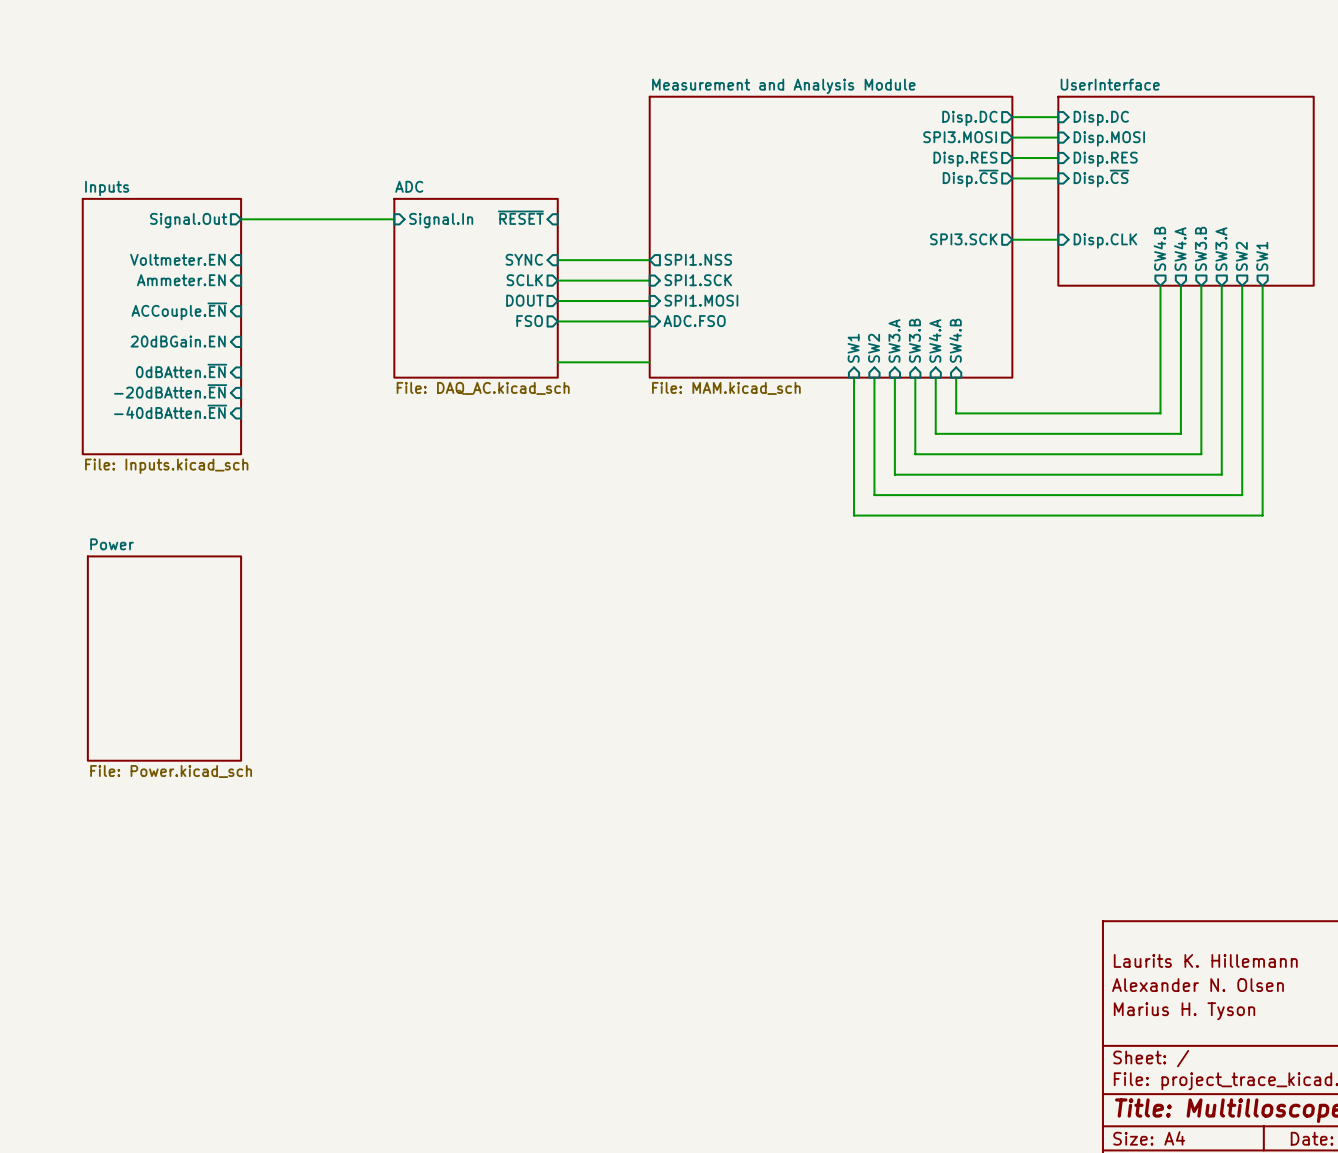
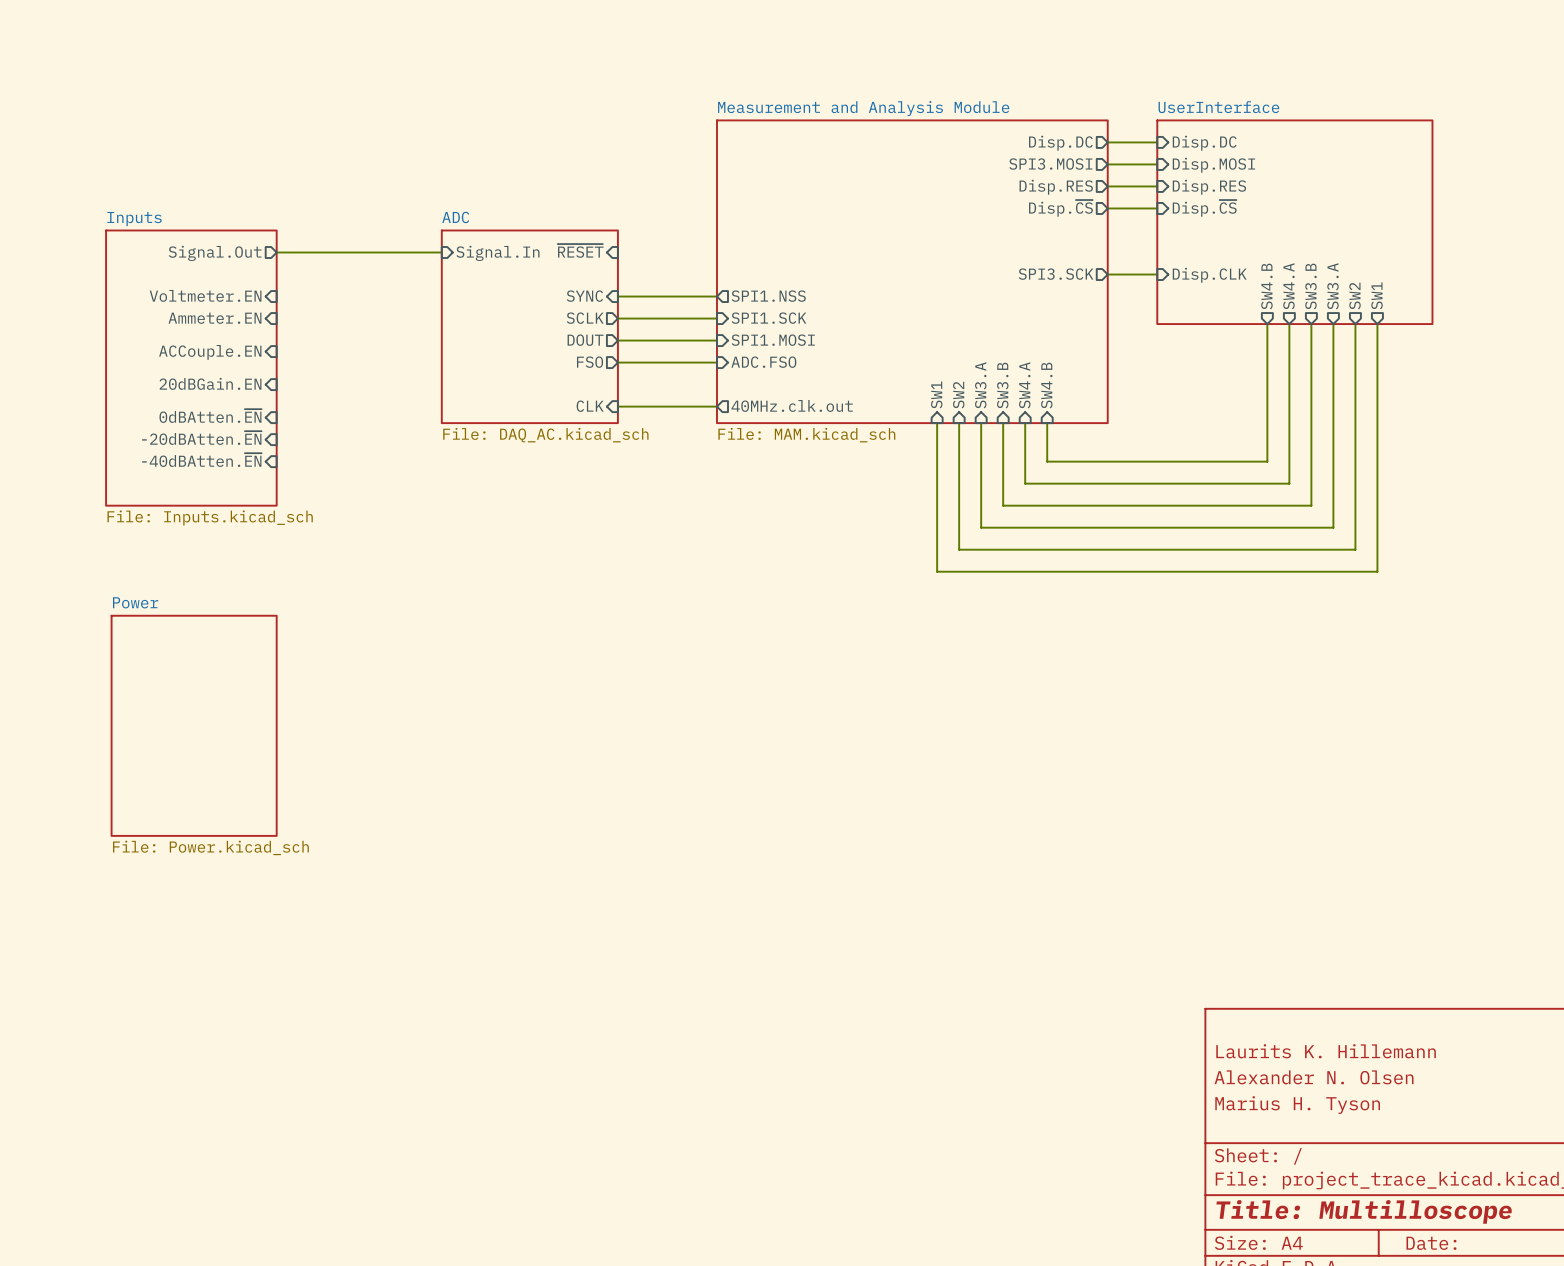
sheet pin: ACCouple.~{EN} (179, 311) -> ACCouple.EN (210, 352)
sheet pin: none -> CLK (590, 406)
sheet pin: none -> 40MHz.clk.out (792, 405)

